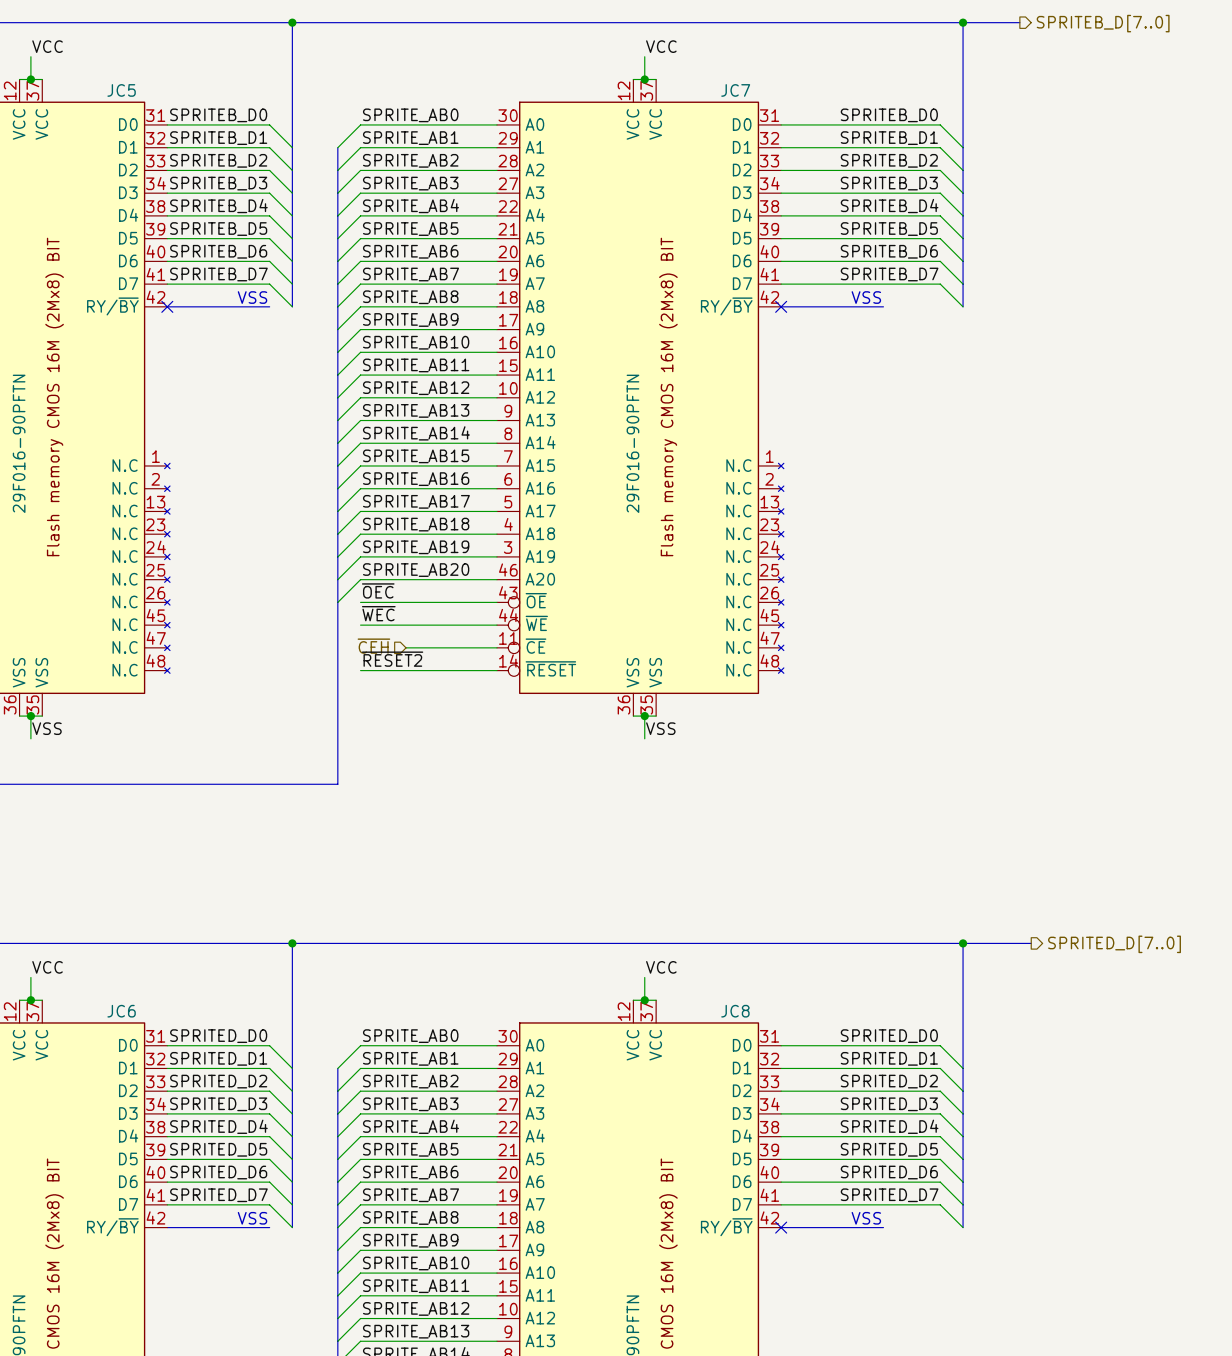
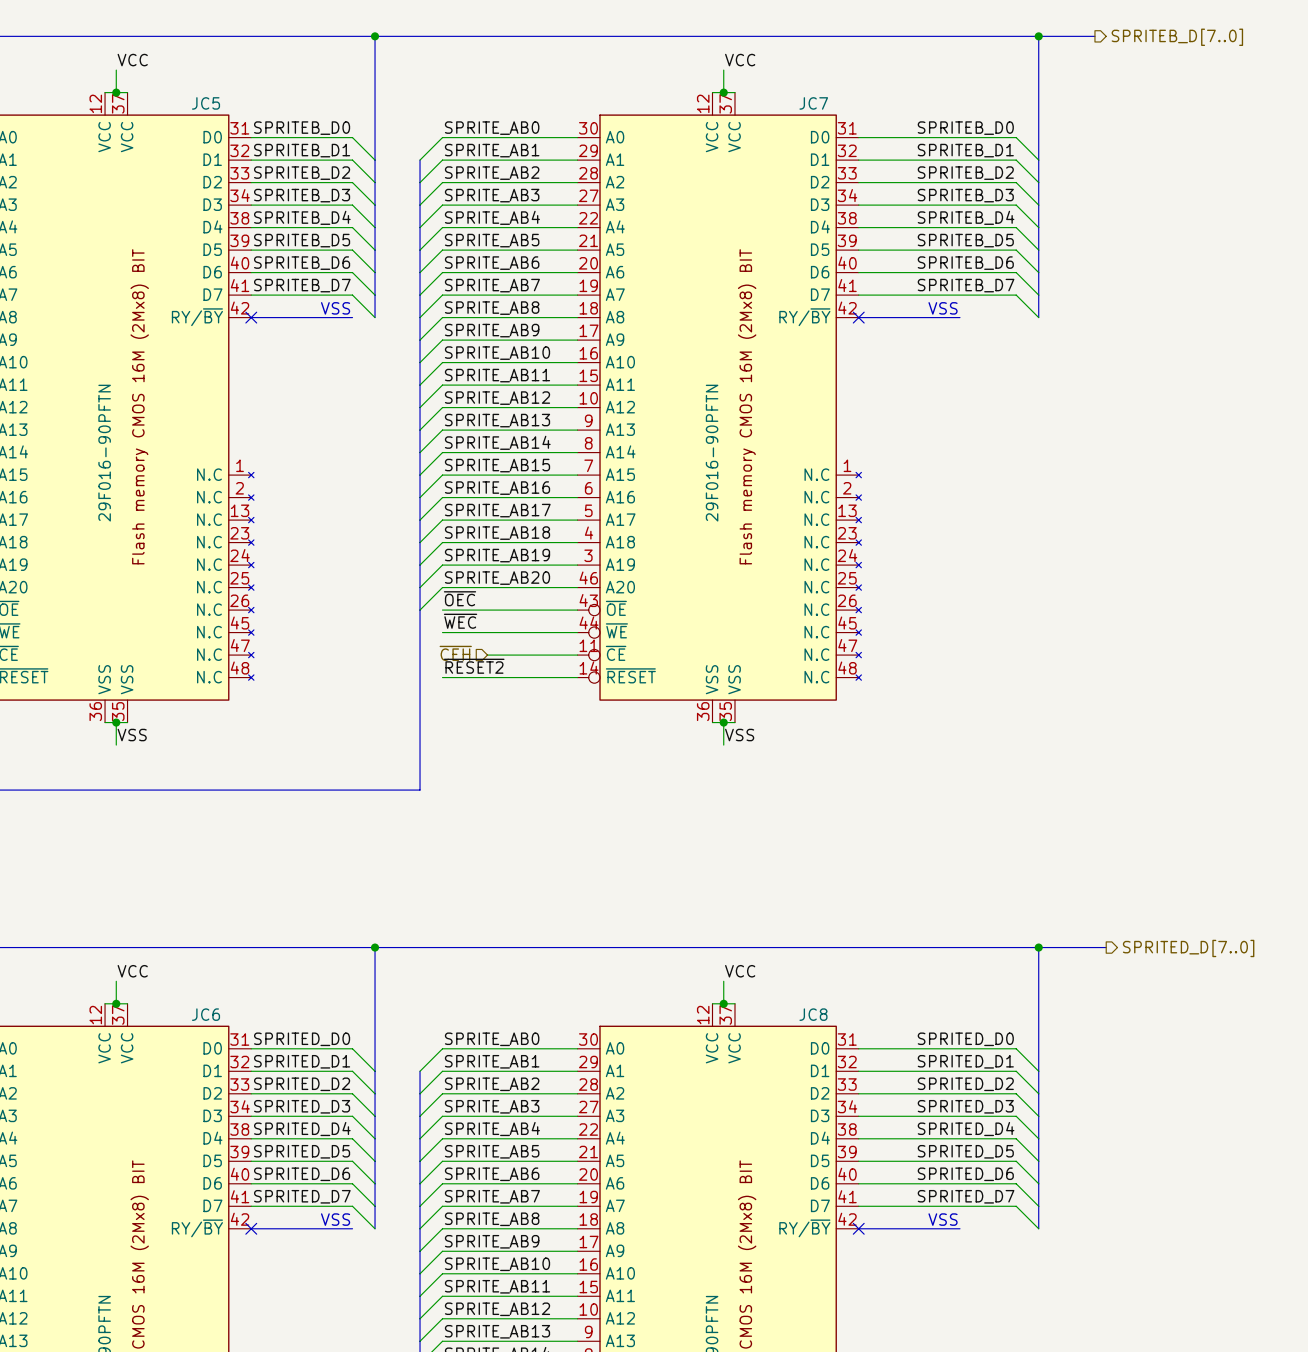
no-connect mark: none -> (251, 1228)

